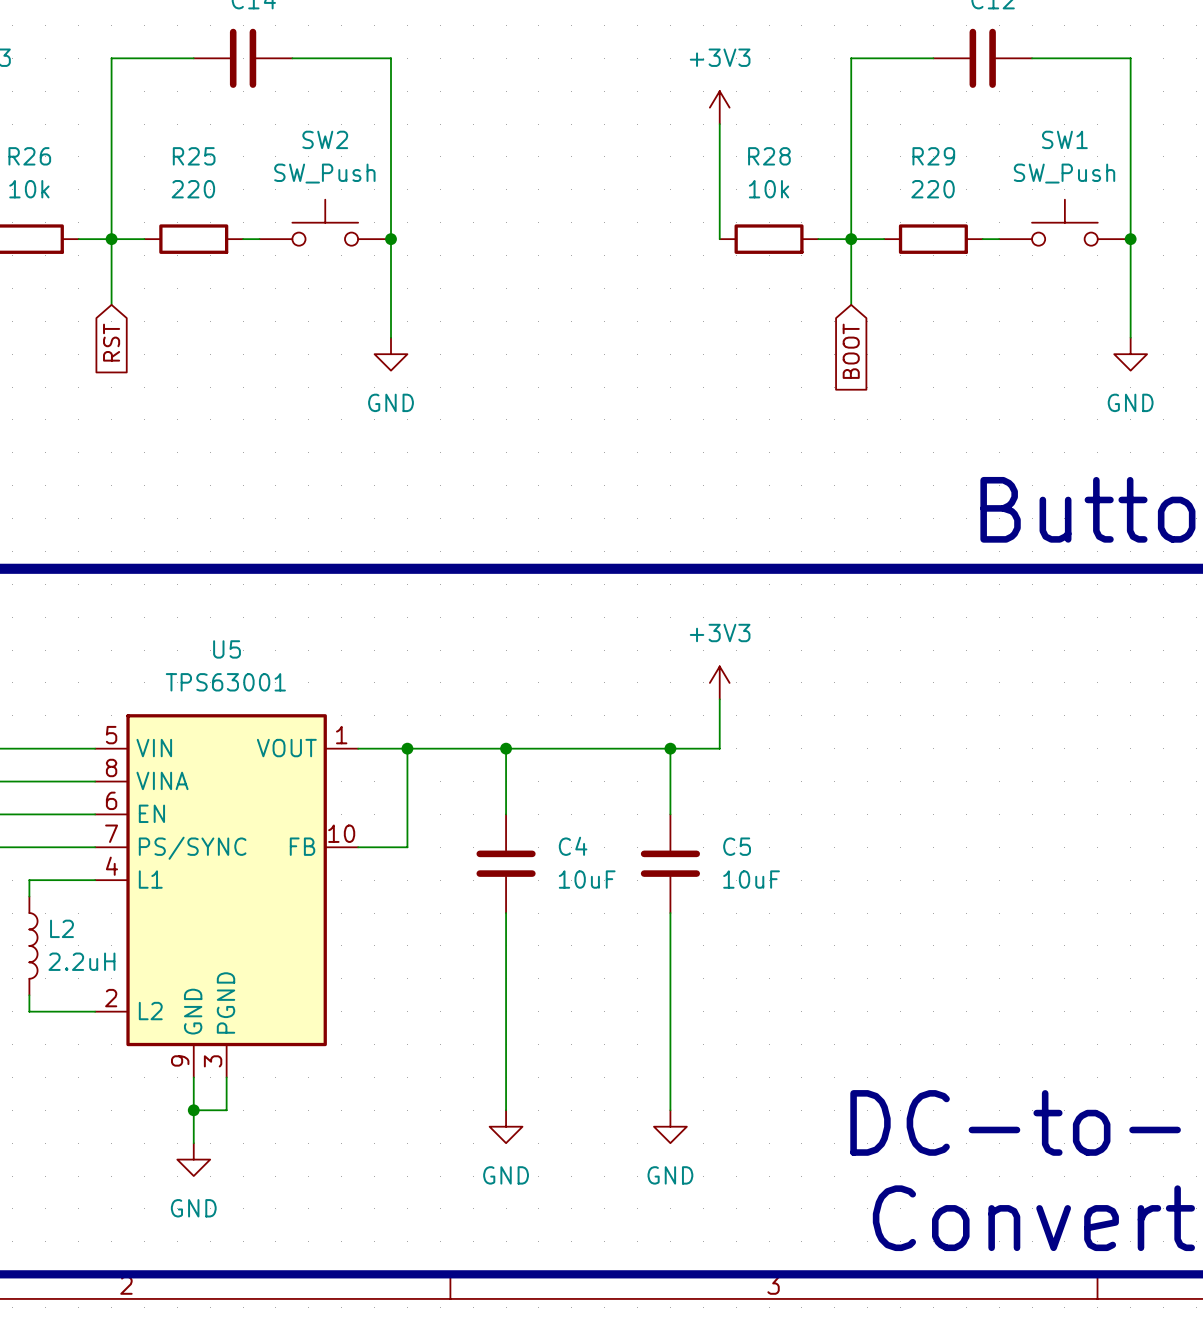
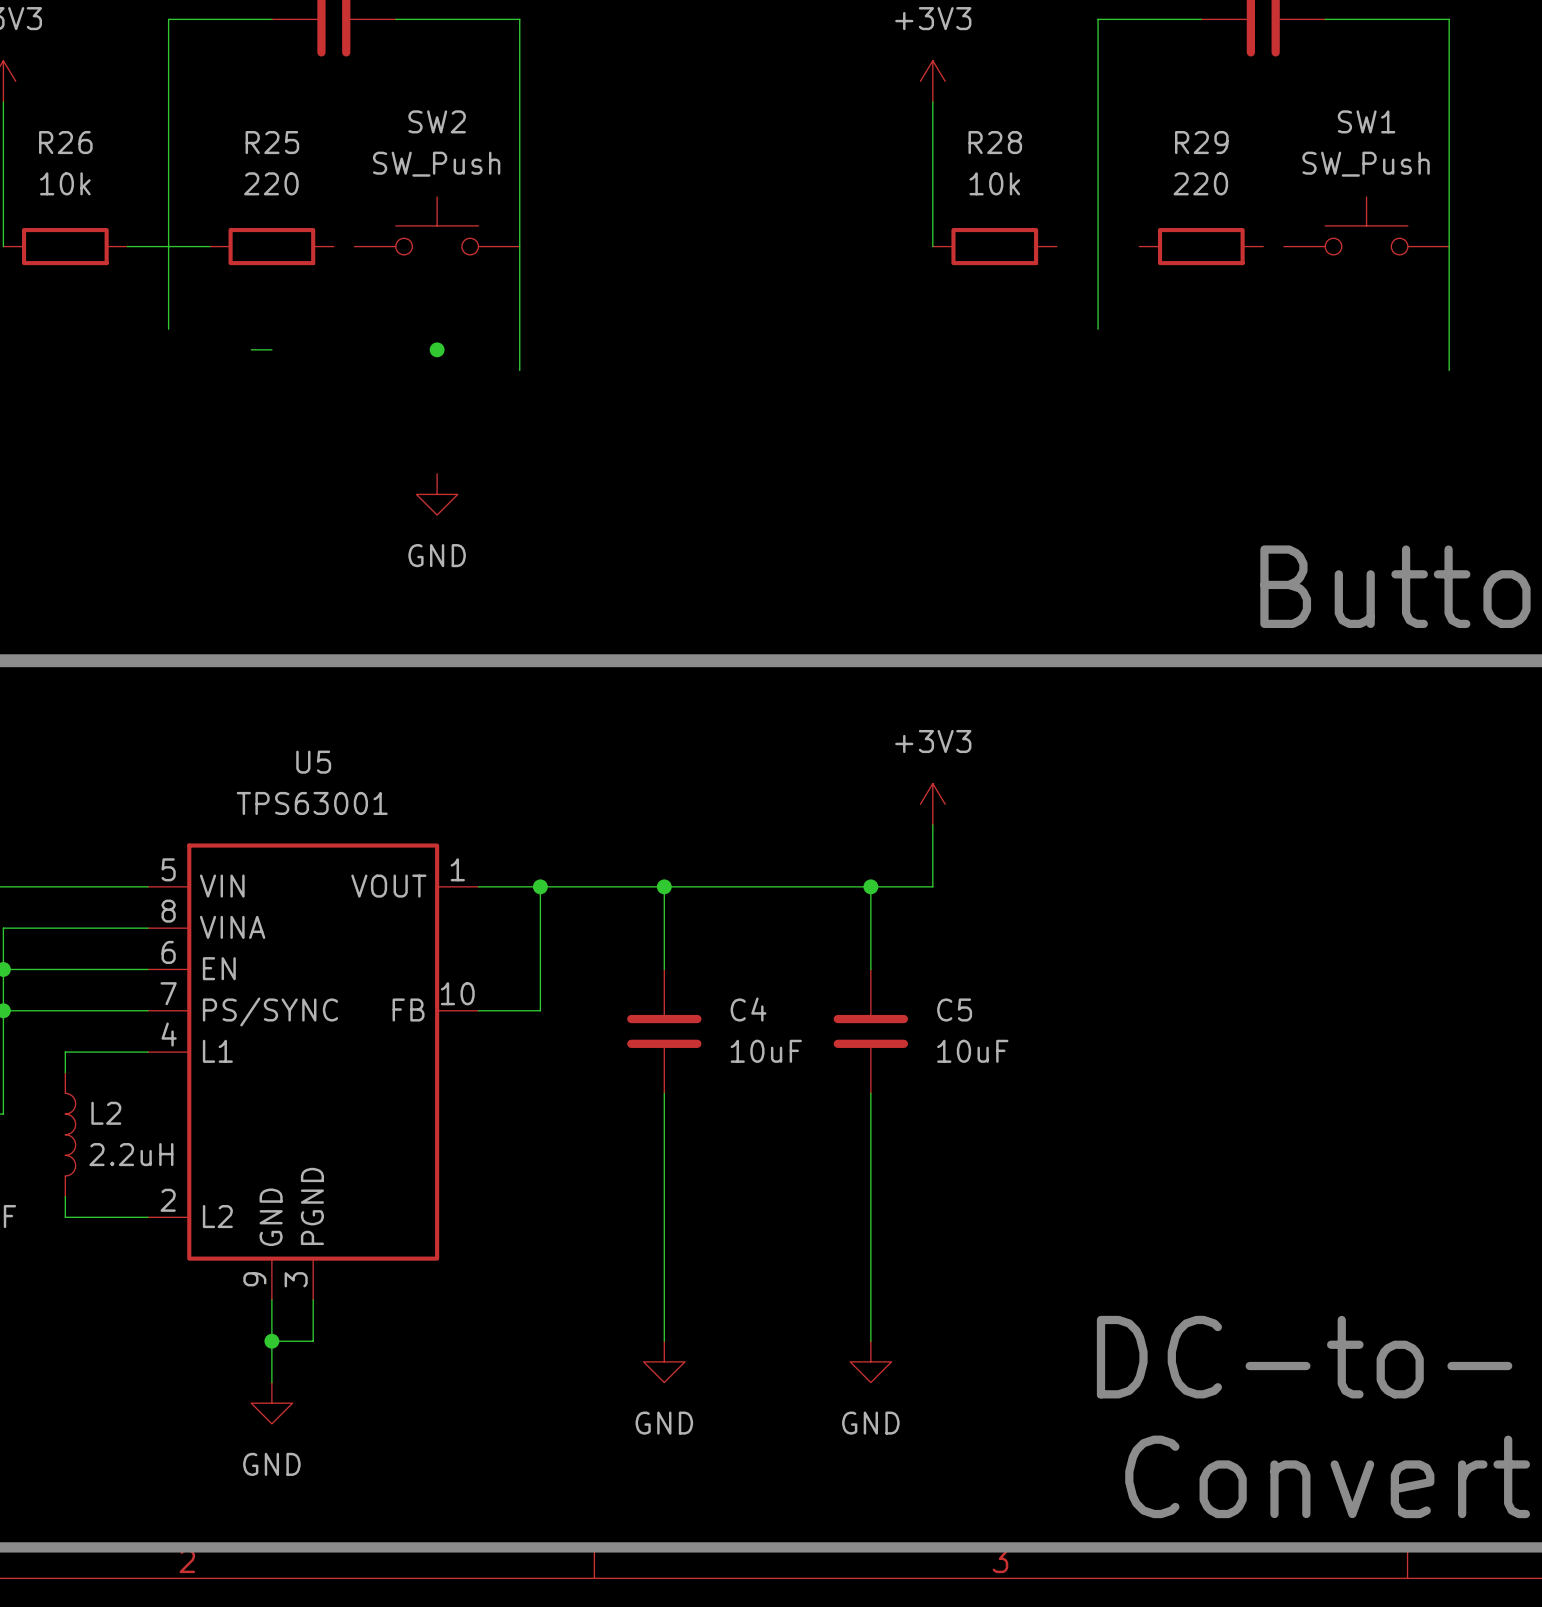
junction: (111, 239) -> none
wire: (243, 239) (259, 239) -> (251, 349) (271, 349)
junction: (391, 239) -> none
wire: (818, 239) (884, 239) -> none
junction: (851, 239) -> none
wire: (982, 239) (999, 239) -> none
junction: (1130, 239) -> none
junction: none -> (437, 349)
global label: RST (111, 342) -> none
global label: BOOT (851, 351) -> none
power symbol position: GND (391, 354) -> GND (437, 494)
power symbol: GND (1130, 354) -> none

